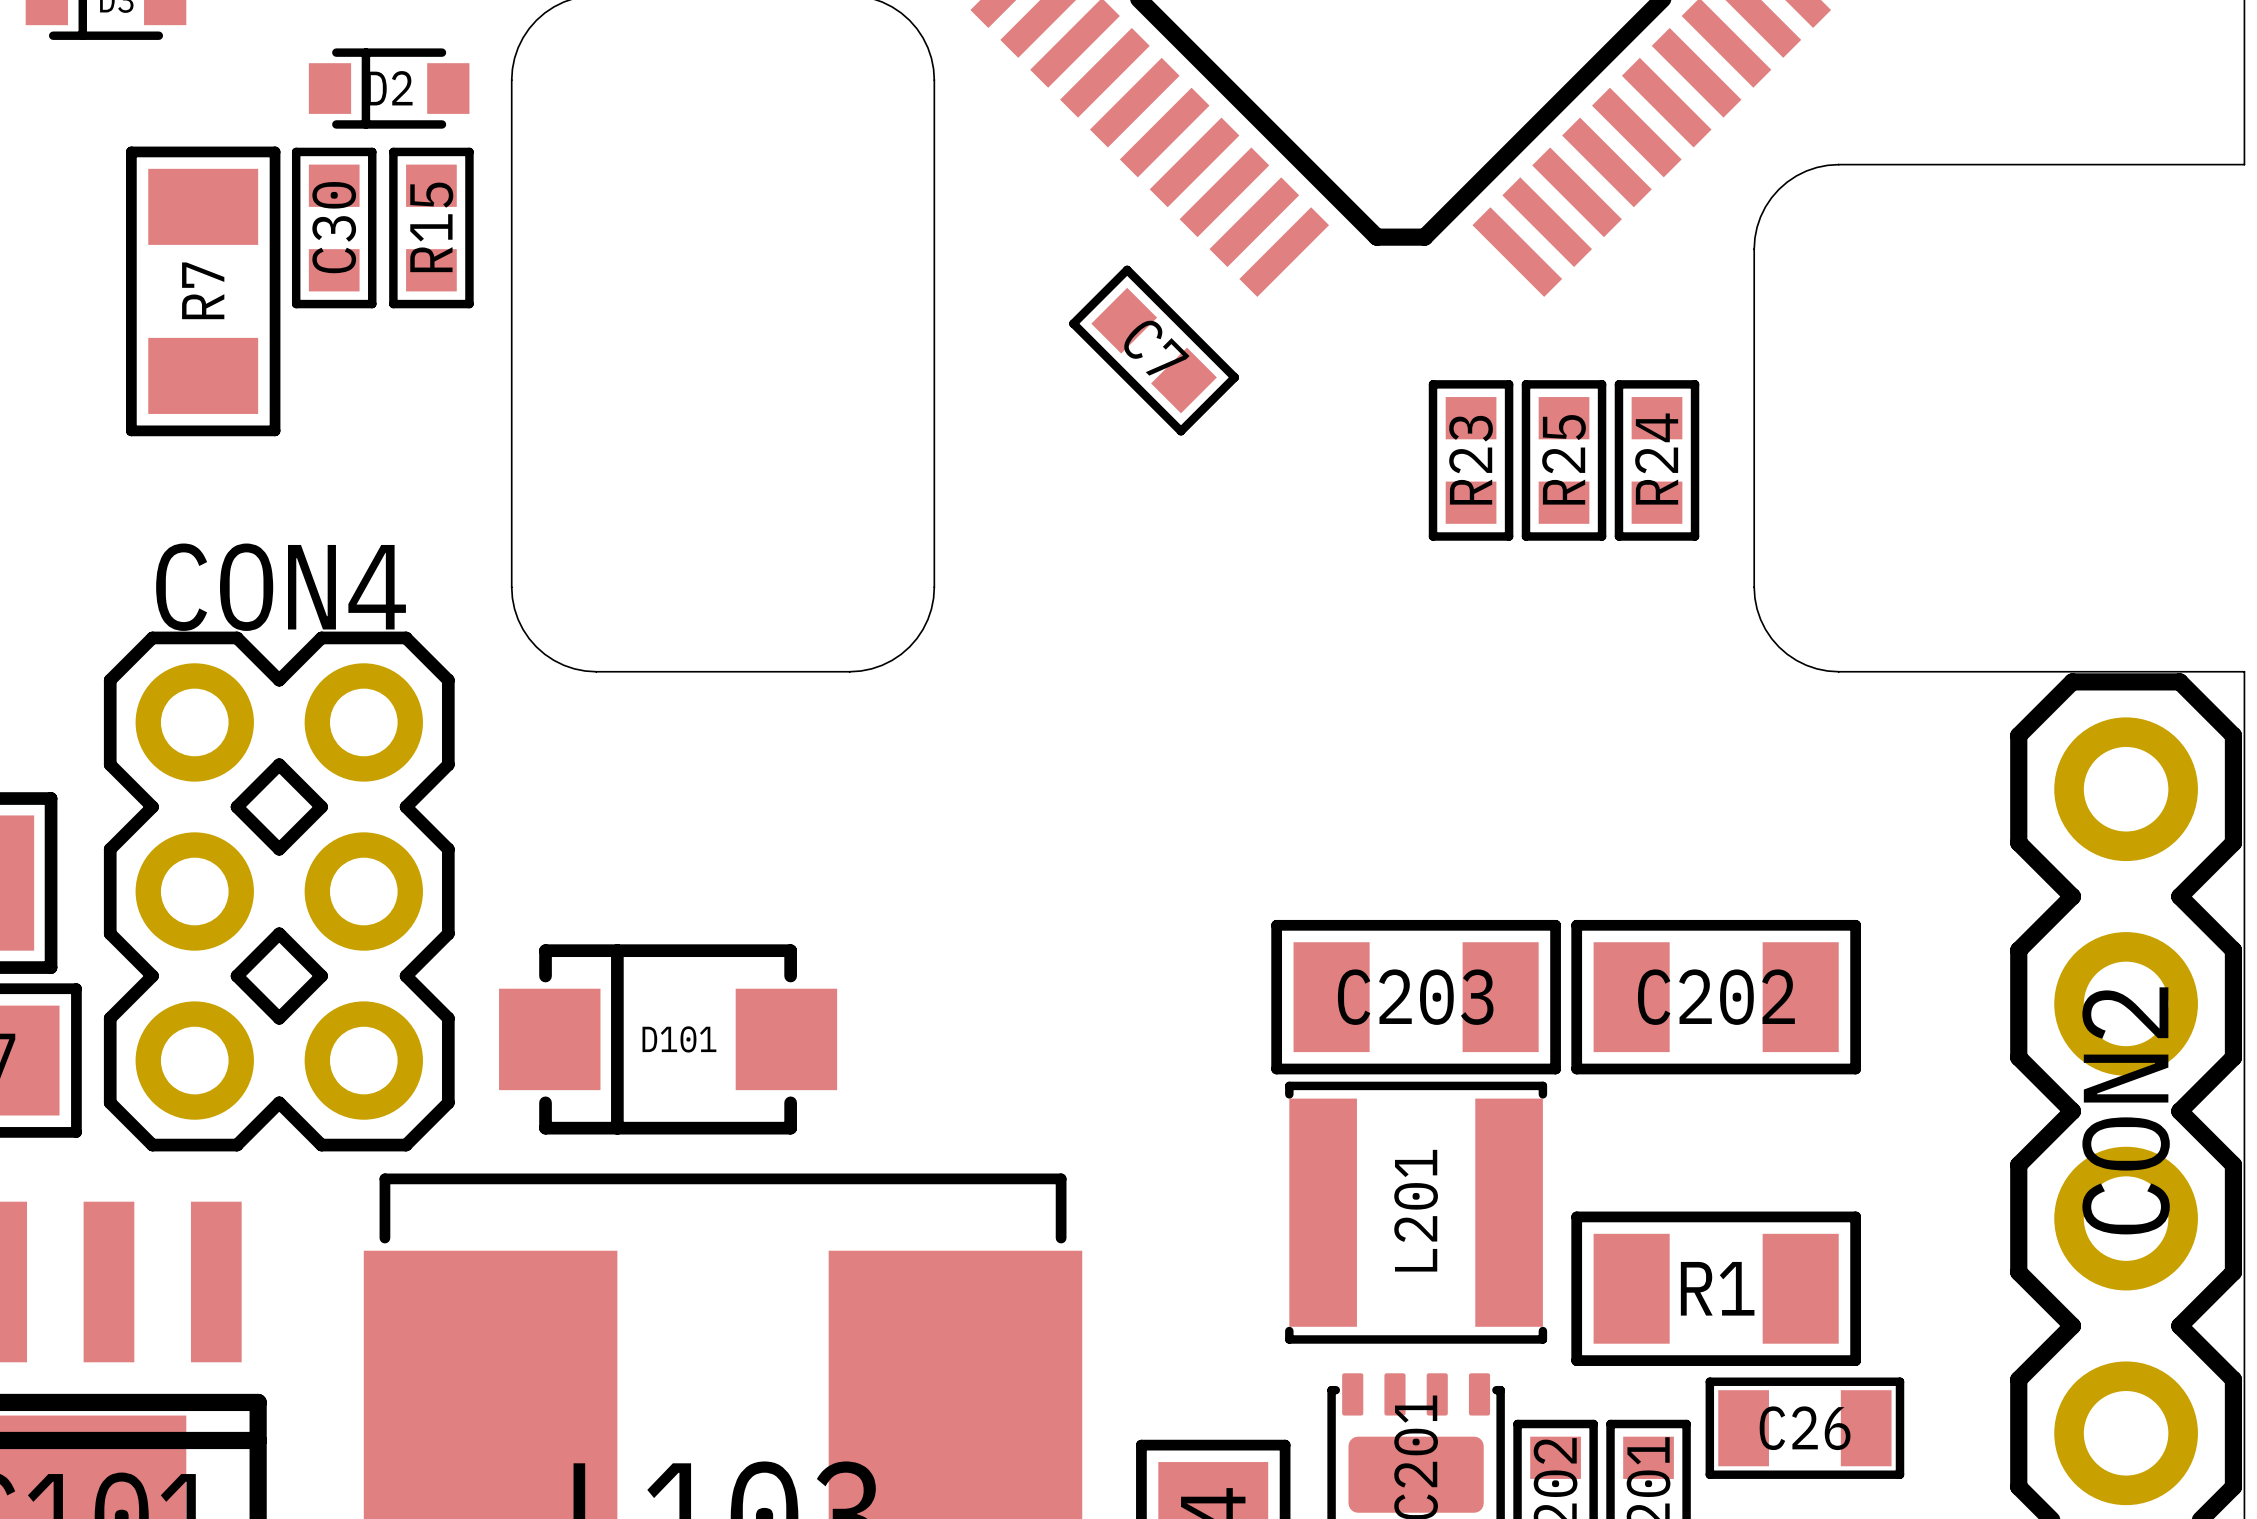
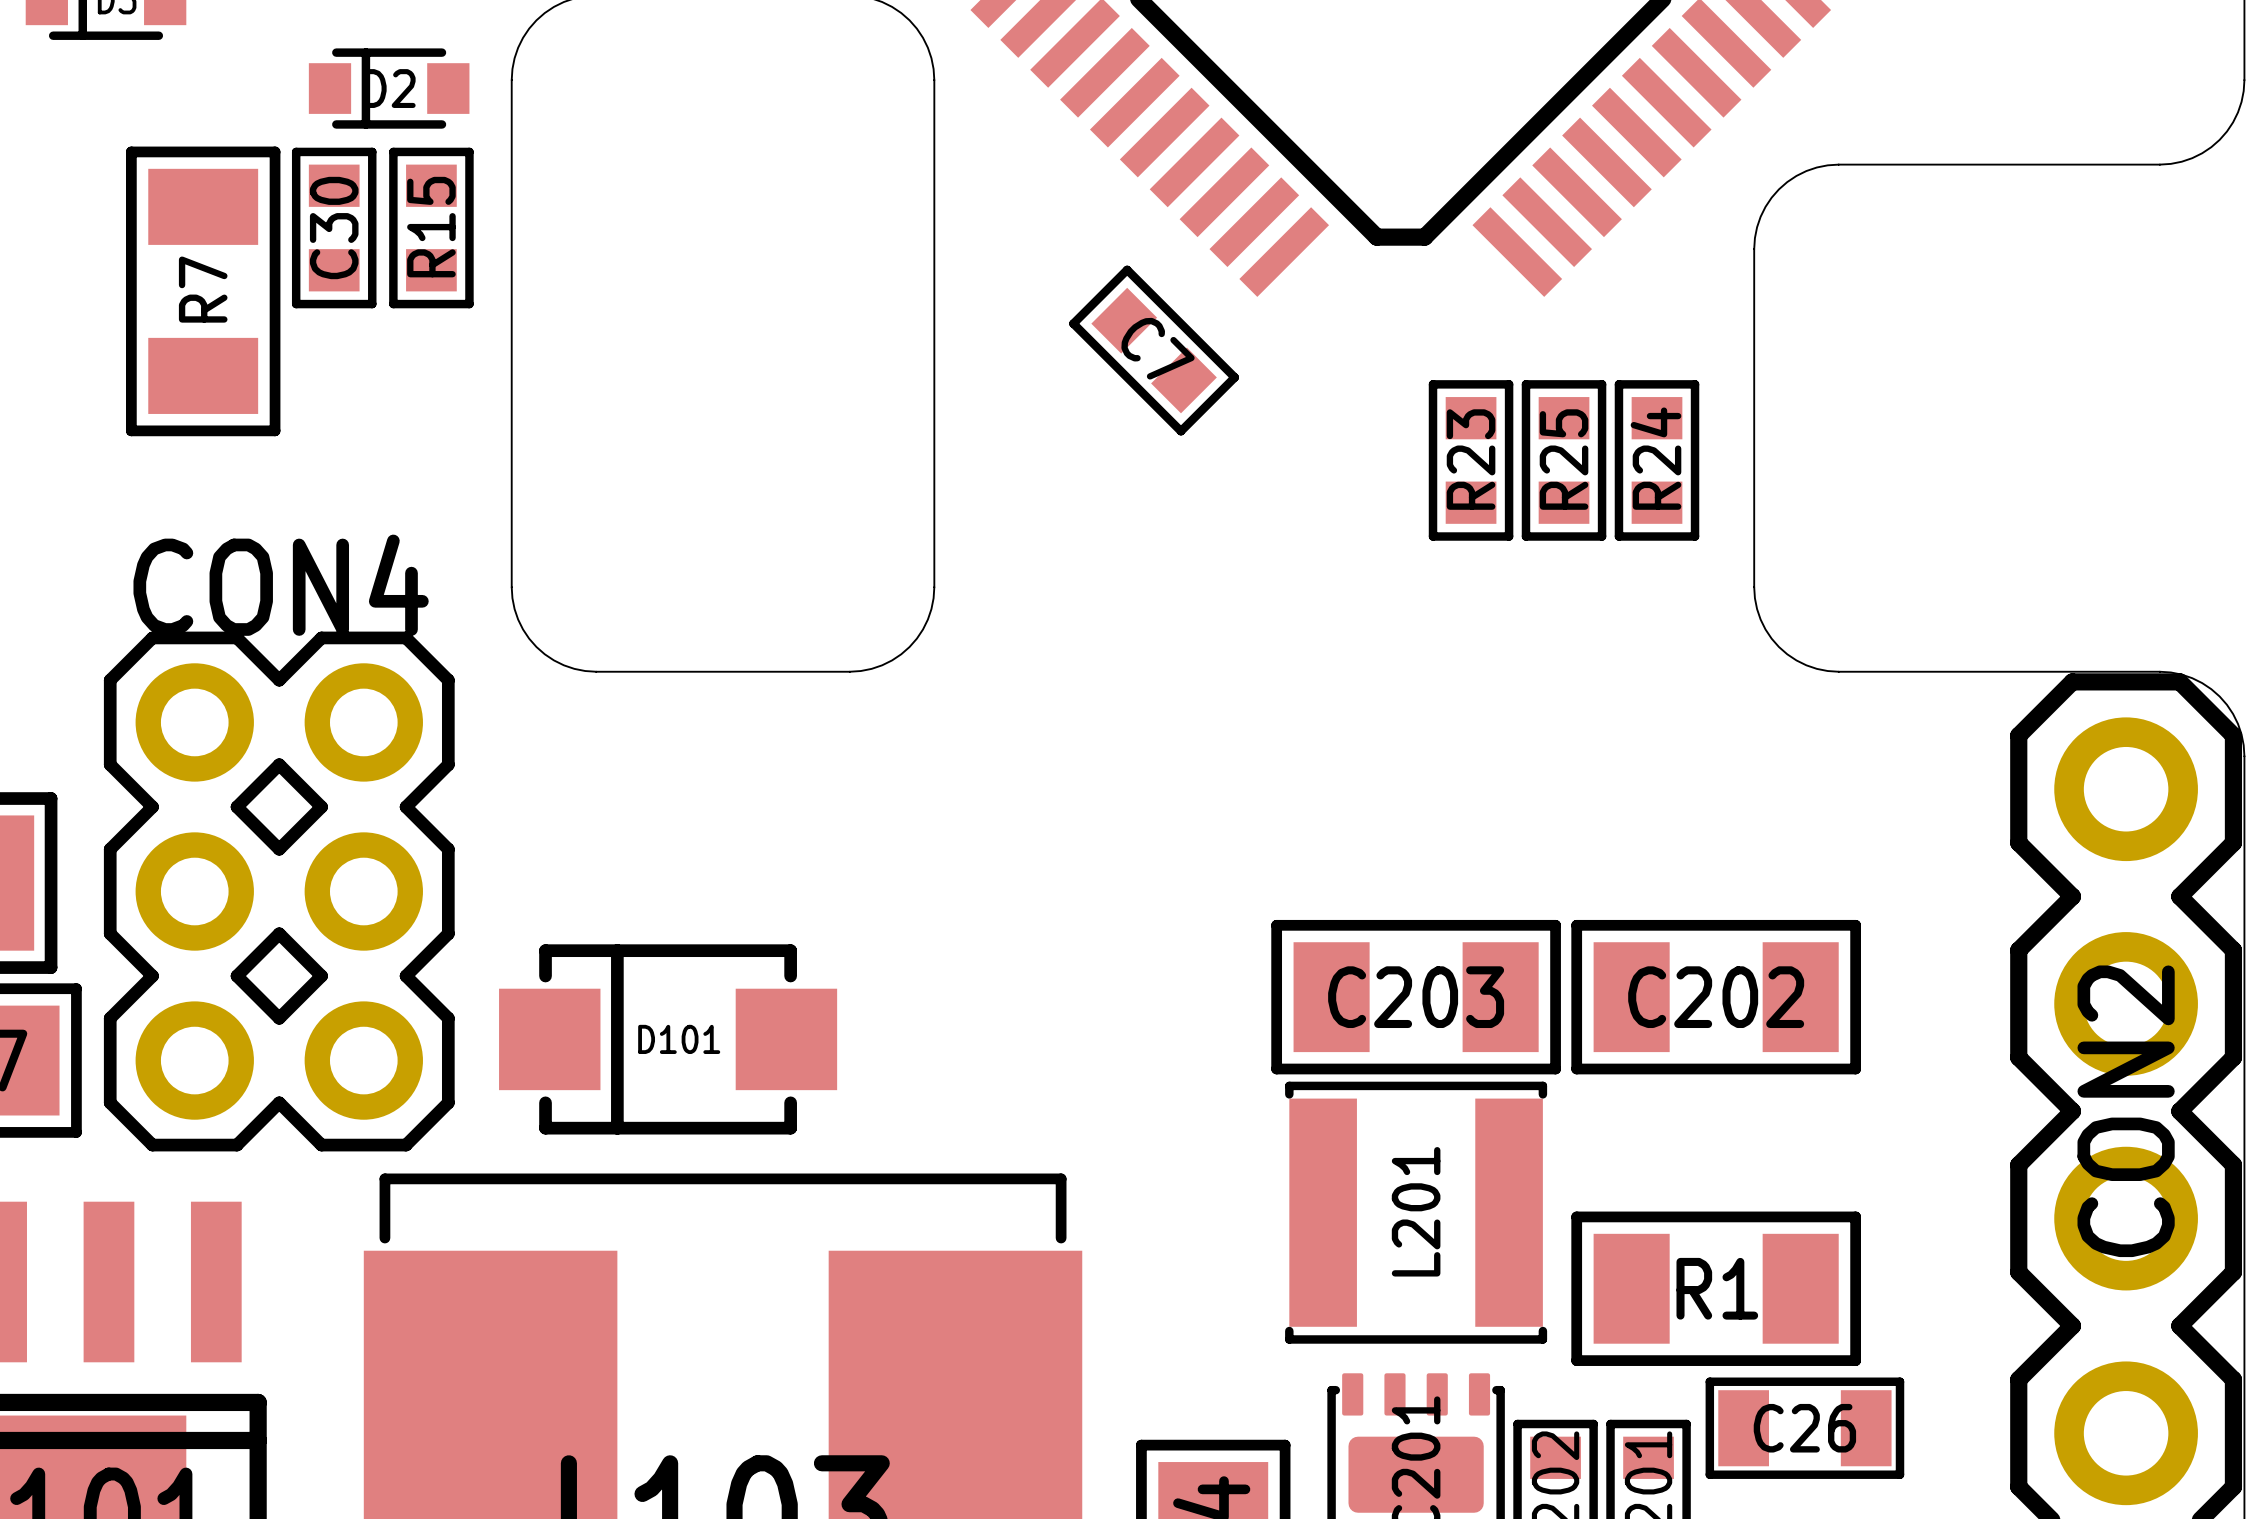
board edge: (2244, 80) (2244, 164) (2159, 164) -> (2244, 80) (2238, 112) (2219, 139) (2192, 158) (2159, 164)
board edge: (2159, 671) (2244, 671) (2244, 756) -> (2159, 671) (2192, 678) (2219, 696) (2238, 723) (2244, 756)

